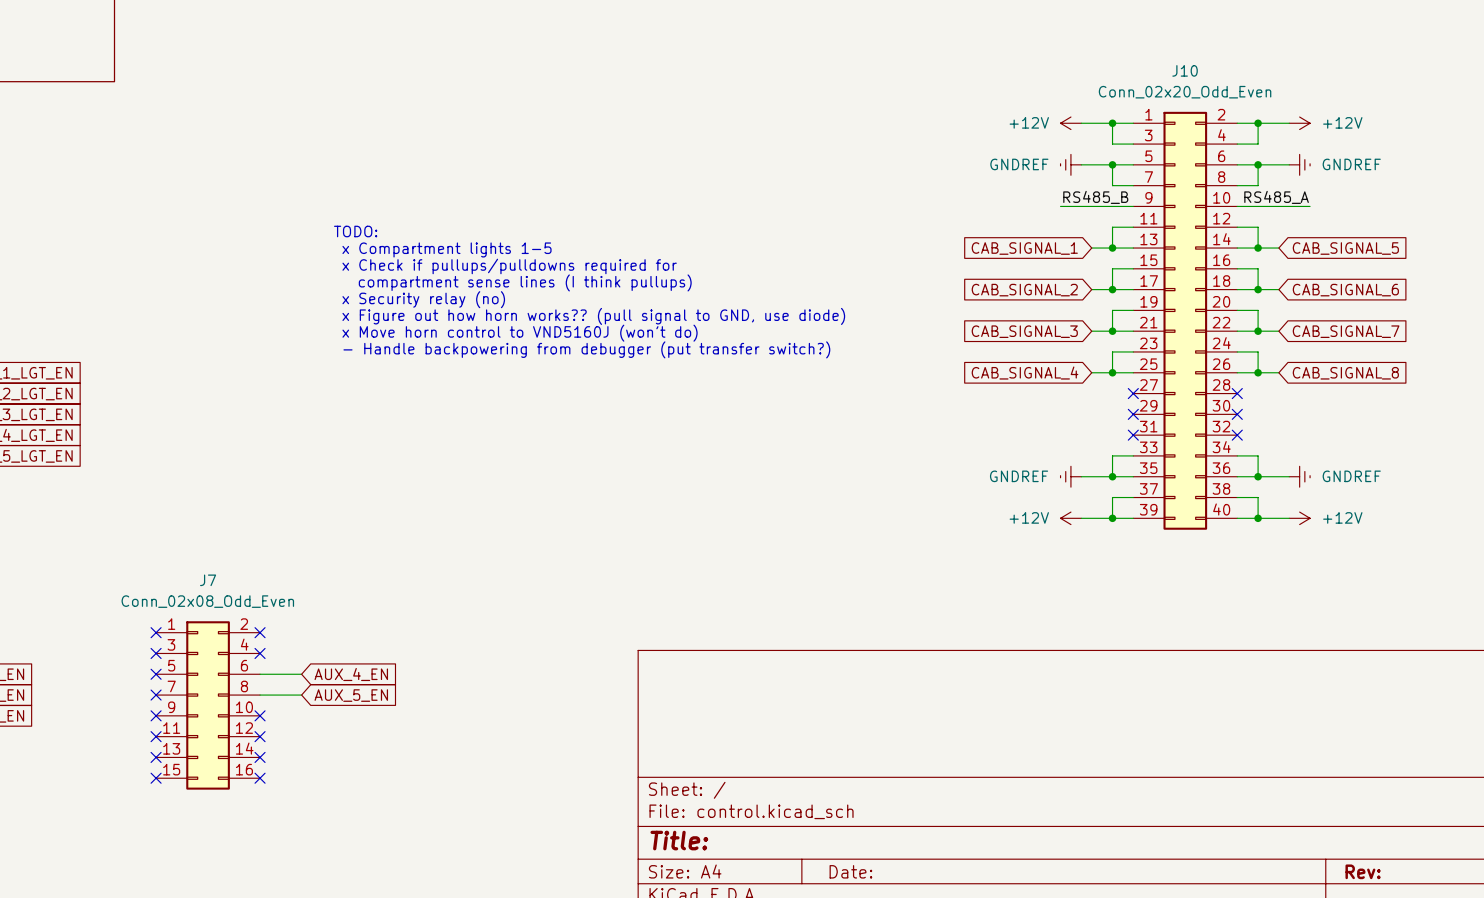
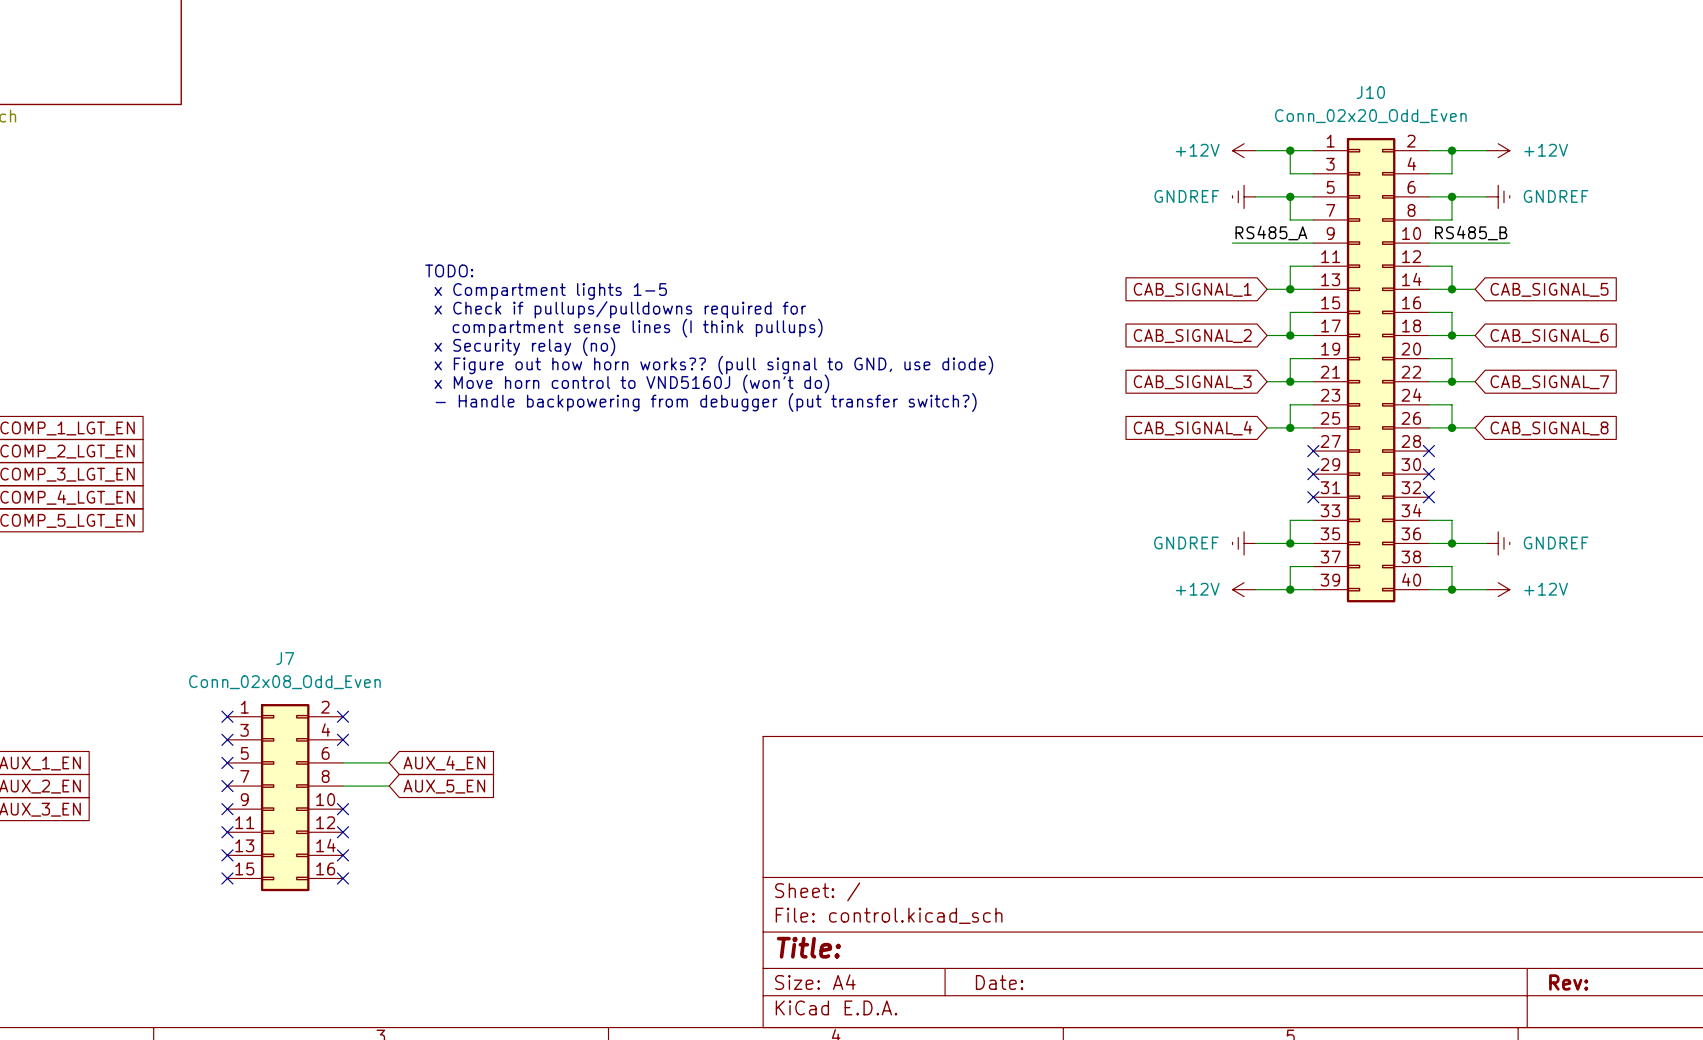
label: RS485_B (1095, 197) -> RS485_A (1271, 233)
label: RS485_A (1276, 197) -> RS485_B (1471, 233)

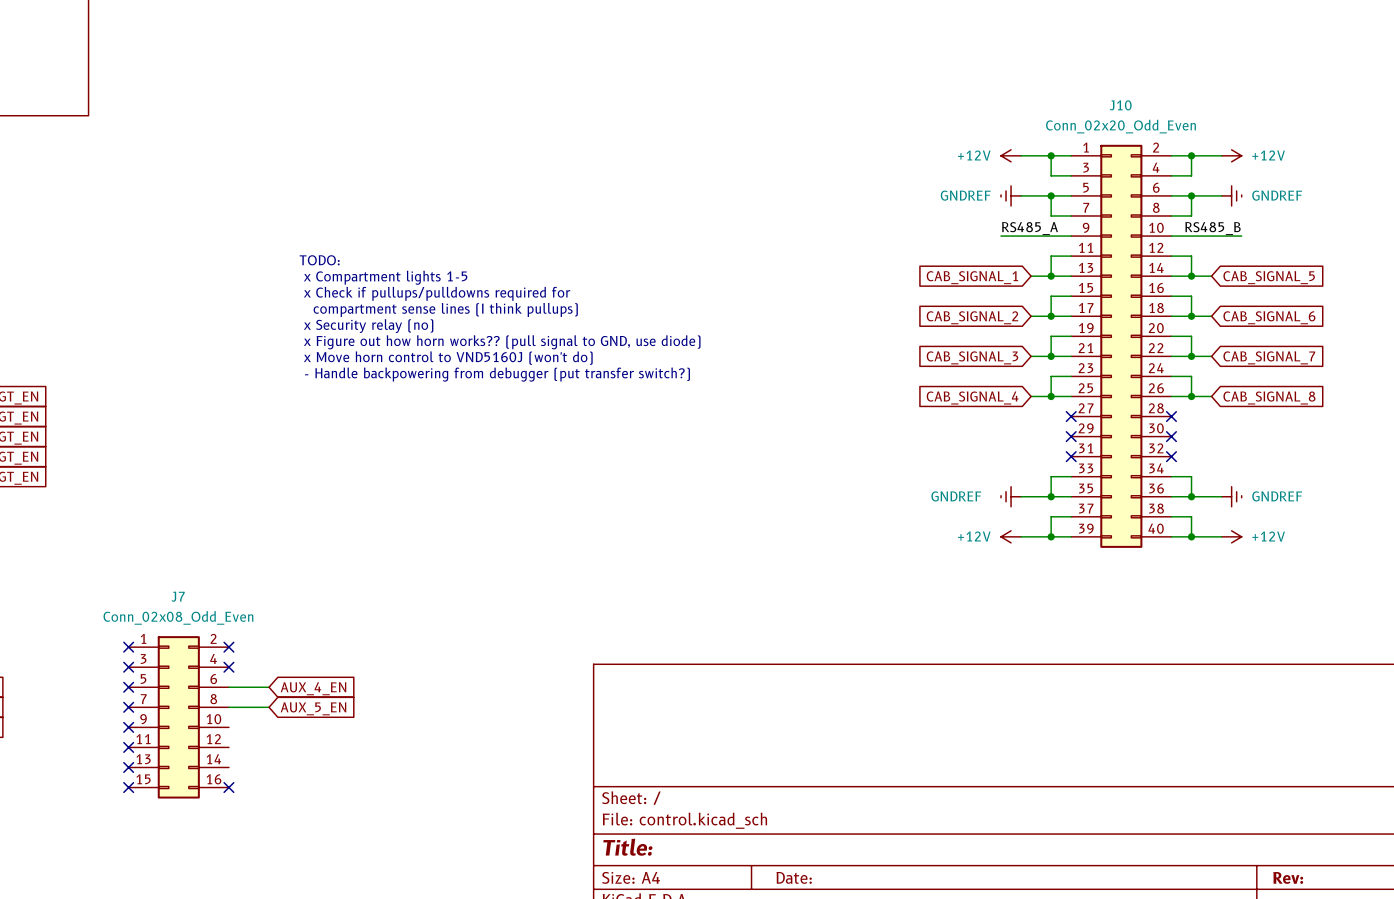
no-connect mark: (342, 809) -> none
no-connect mark: (342, 832) -> none
no-connect mark: (342, 855) -> none

